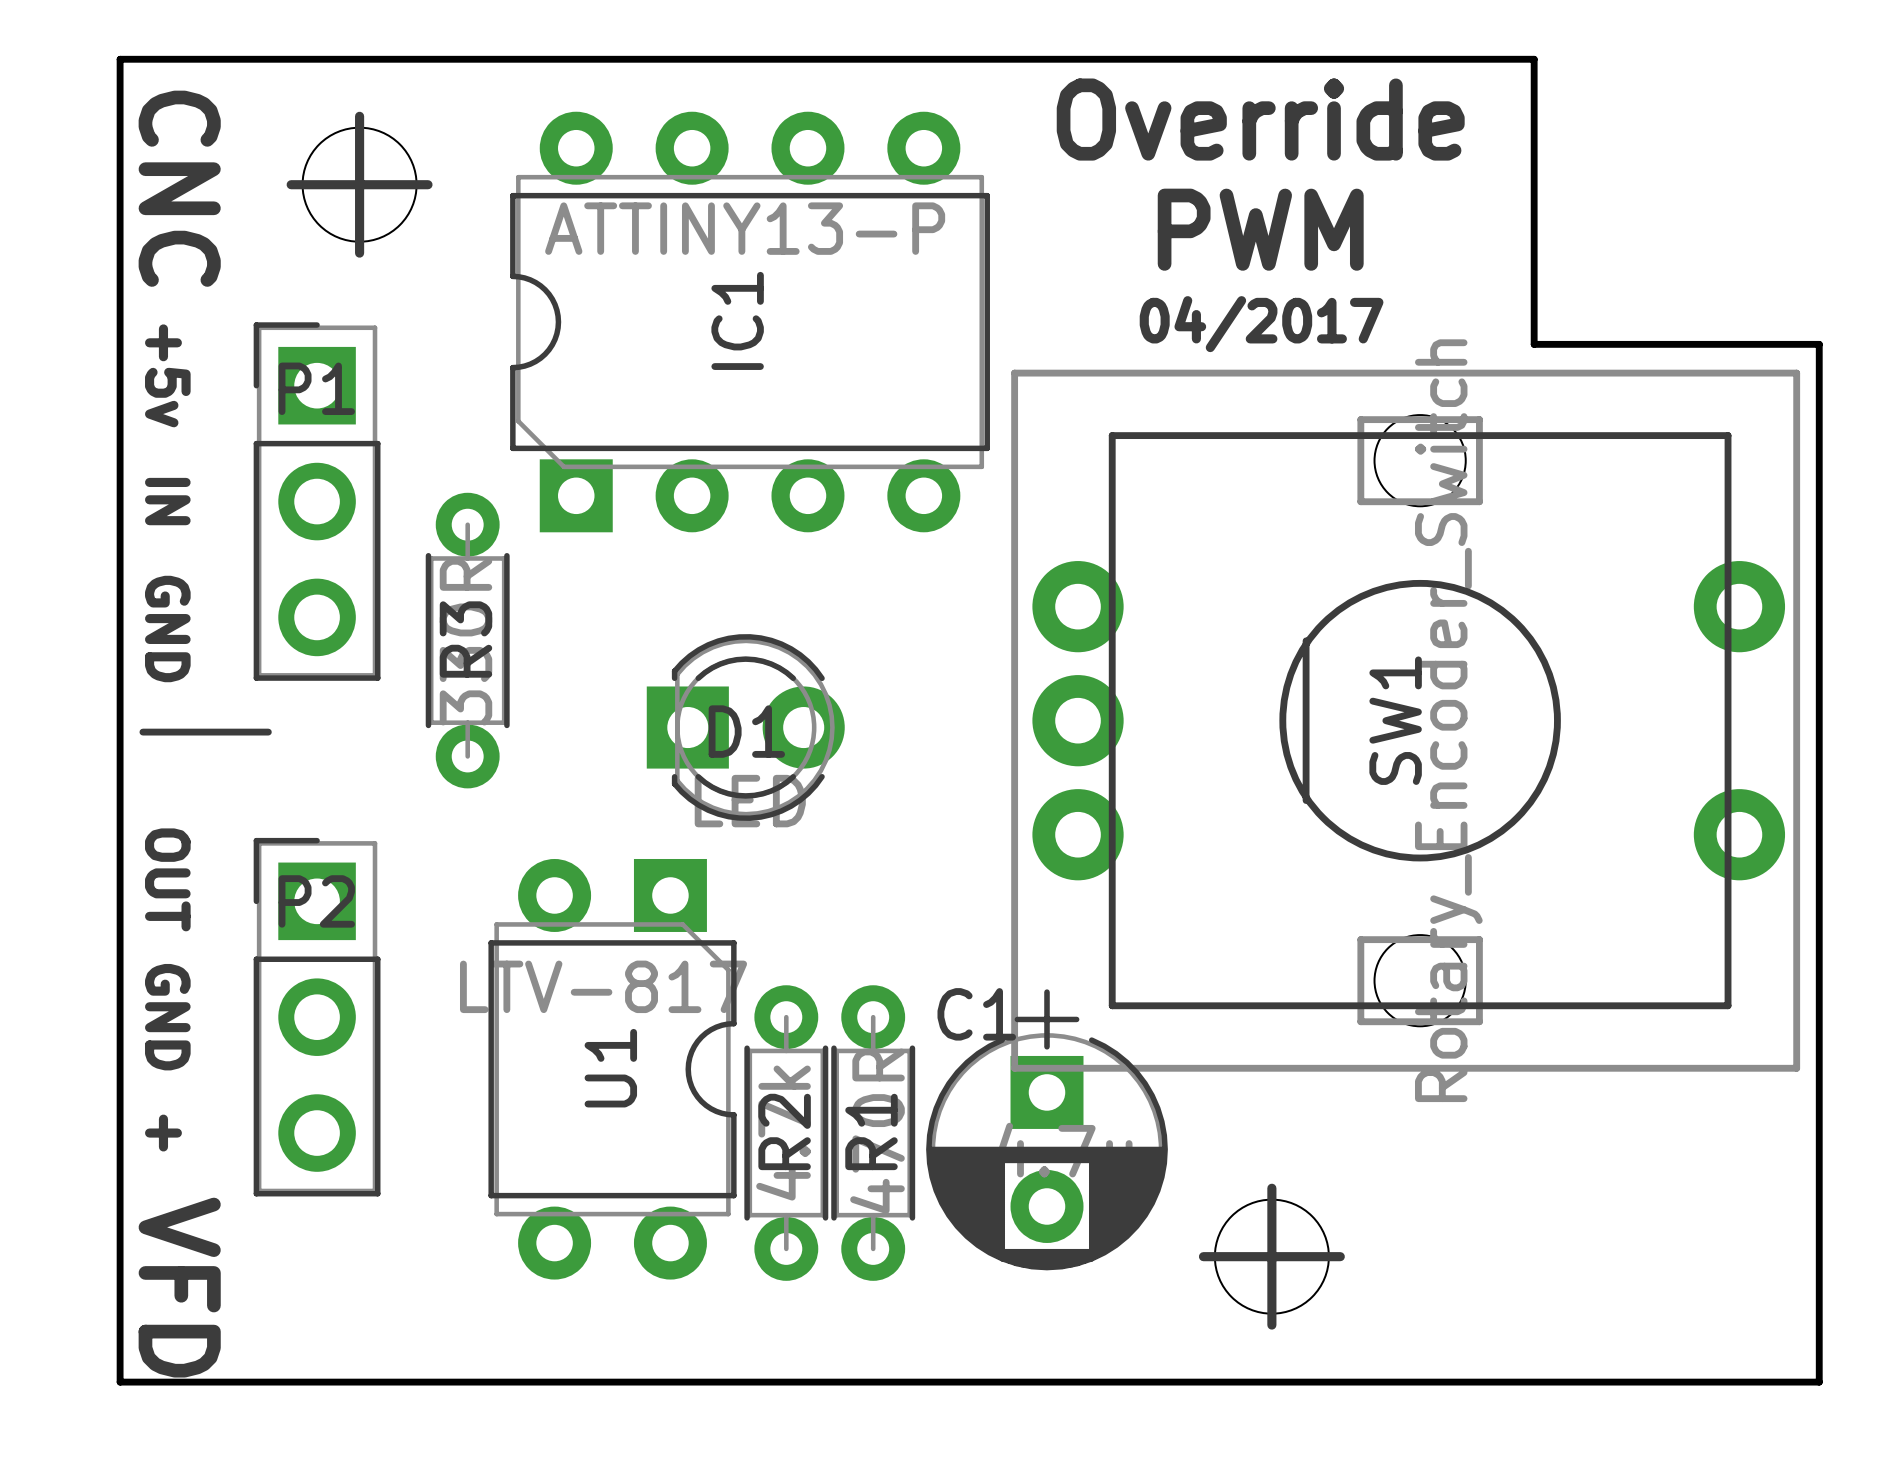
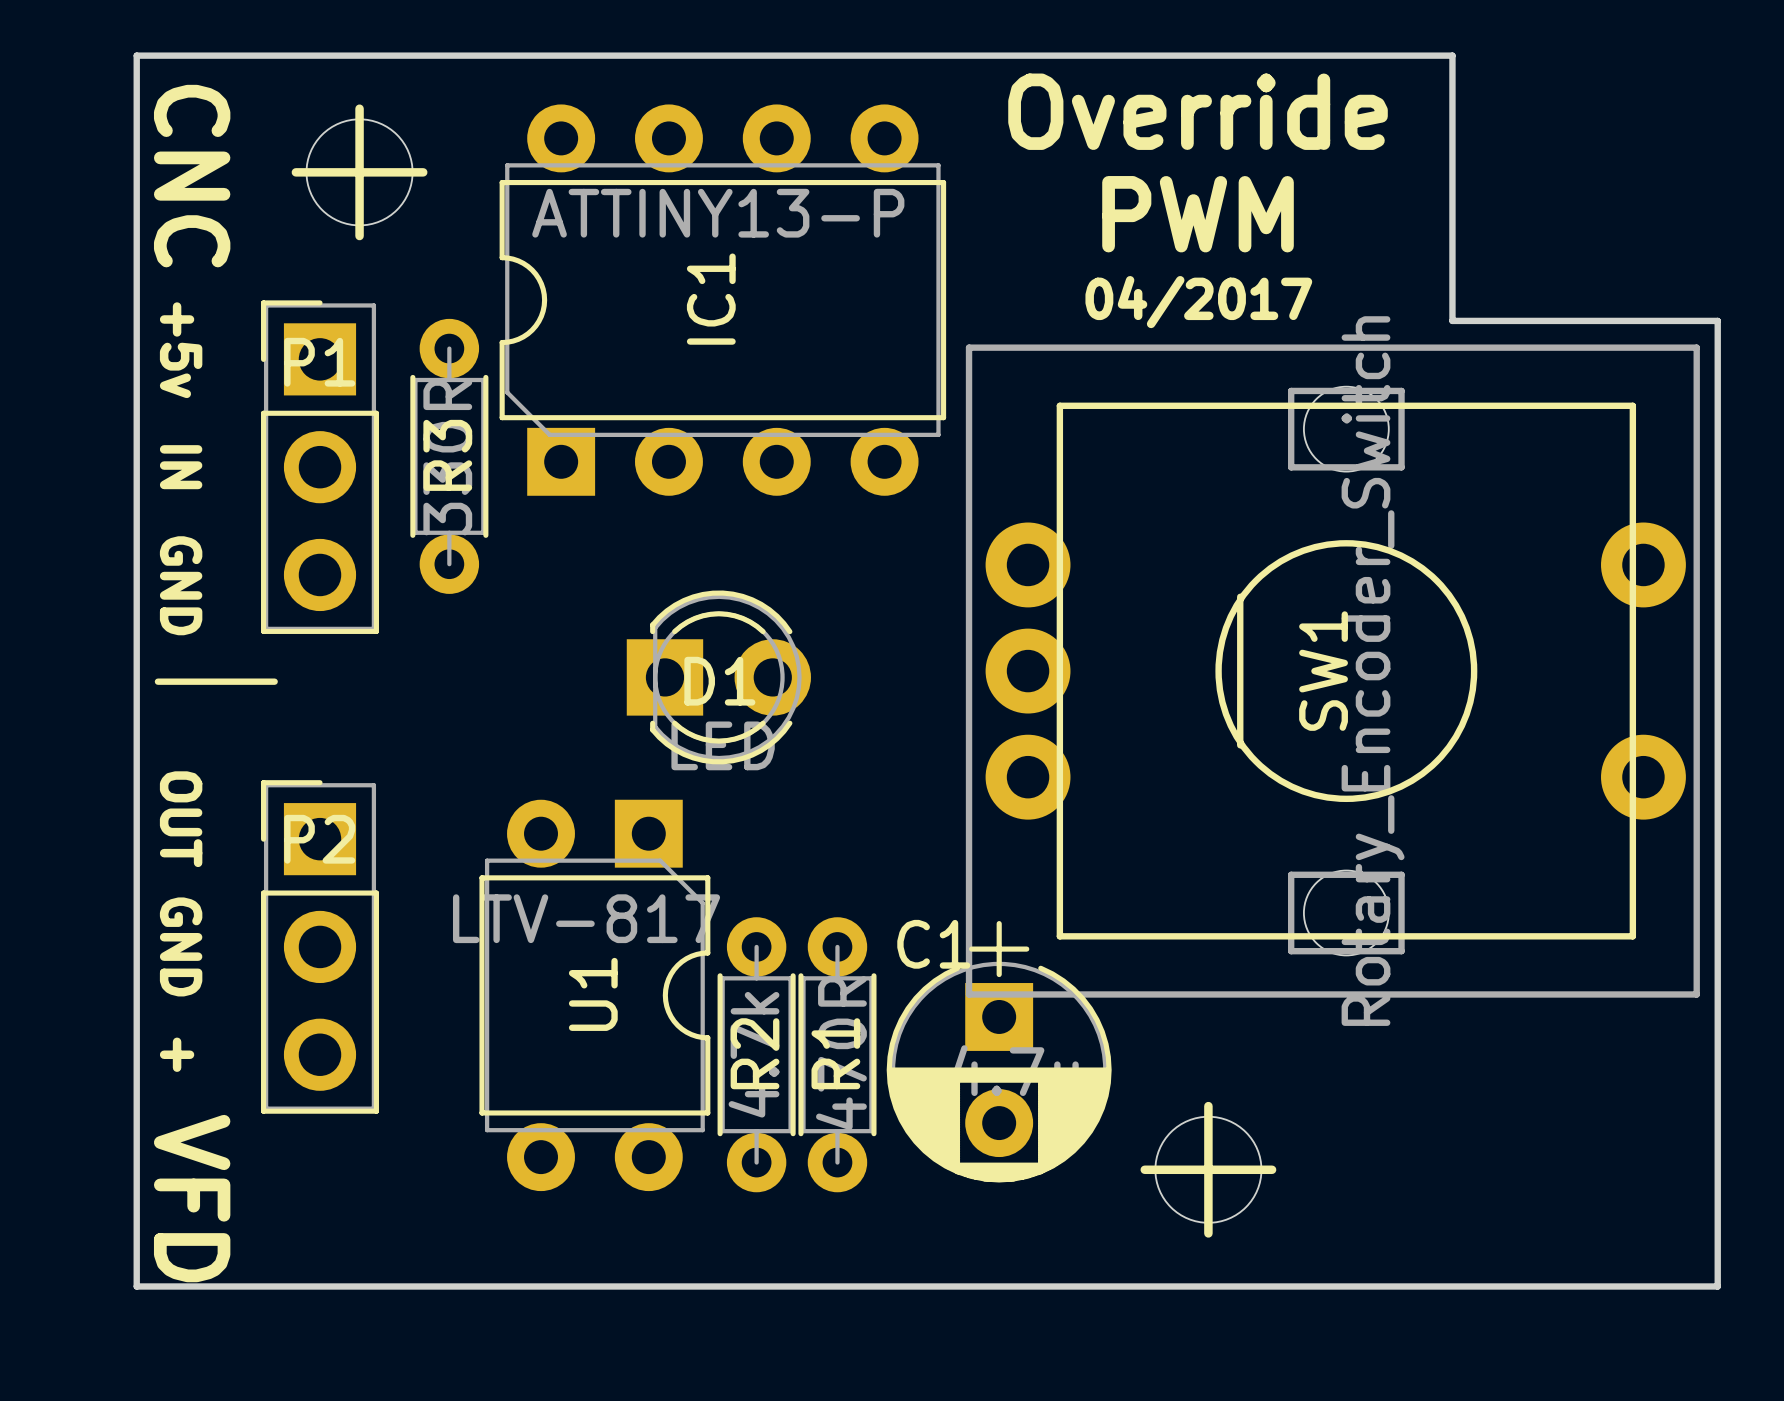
R3 position: (467, 640) -> (449, 456)

